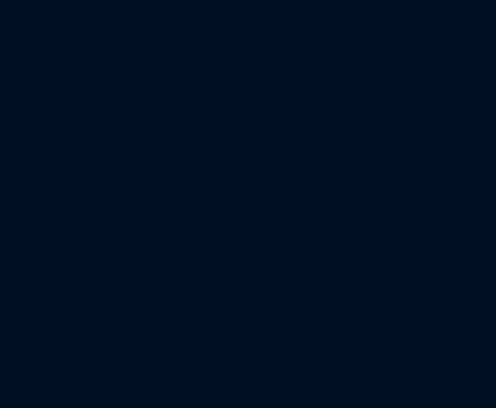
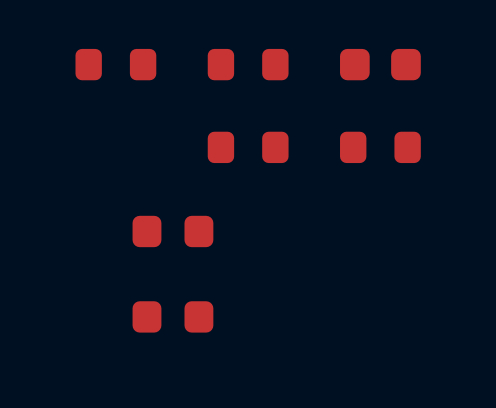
part: none -> (115, 64)
part: none -> (248, 64)
part: none -> (380, 64)
part: none -> (248, 147)
part: none -> (380, 147)
part: none -> (172, 231)
part: none -> (172, 316)

